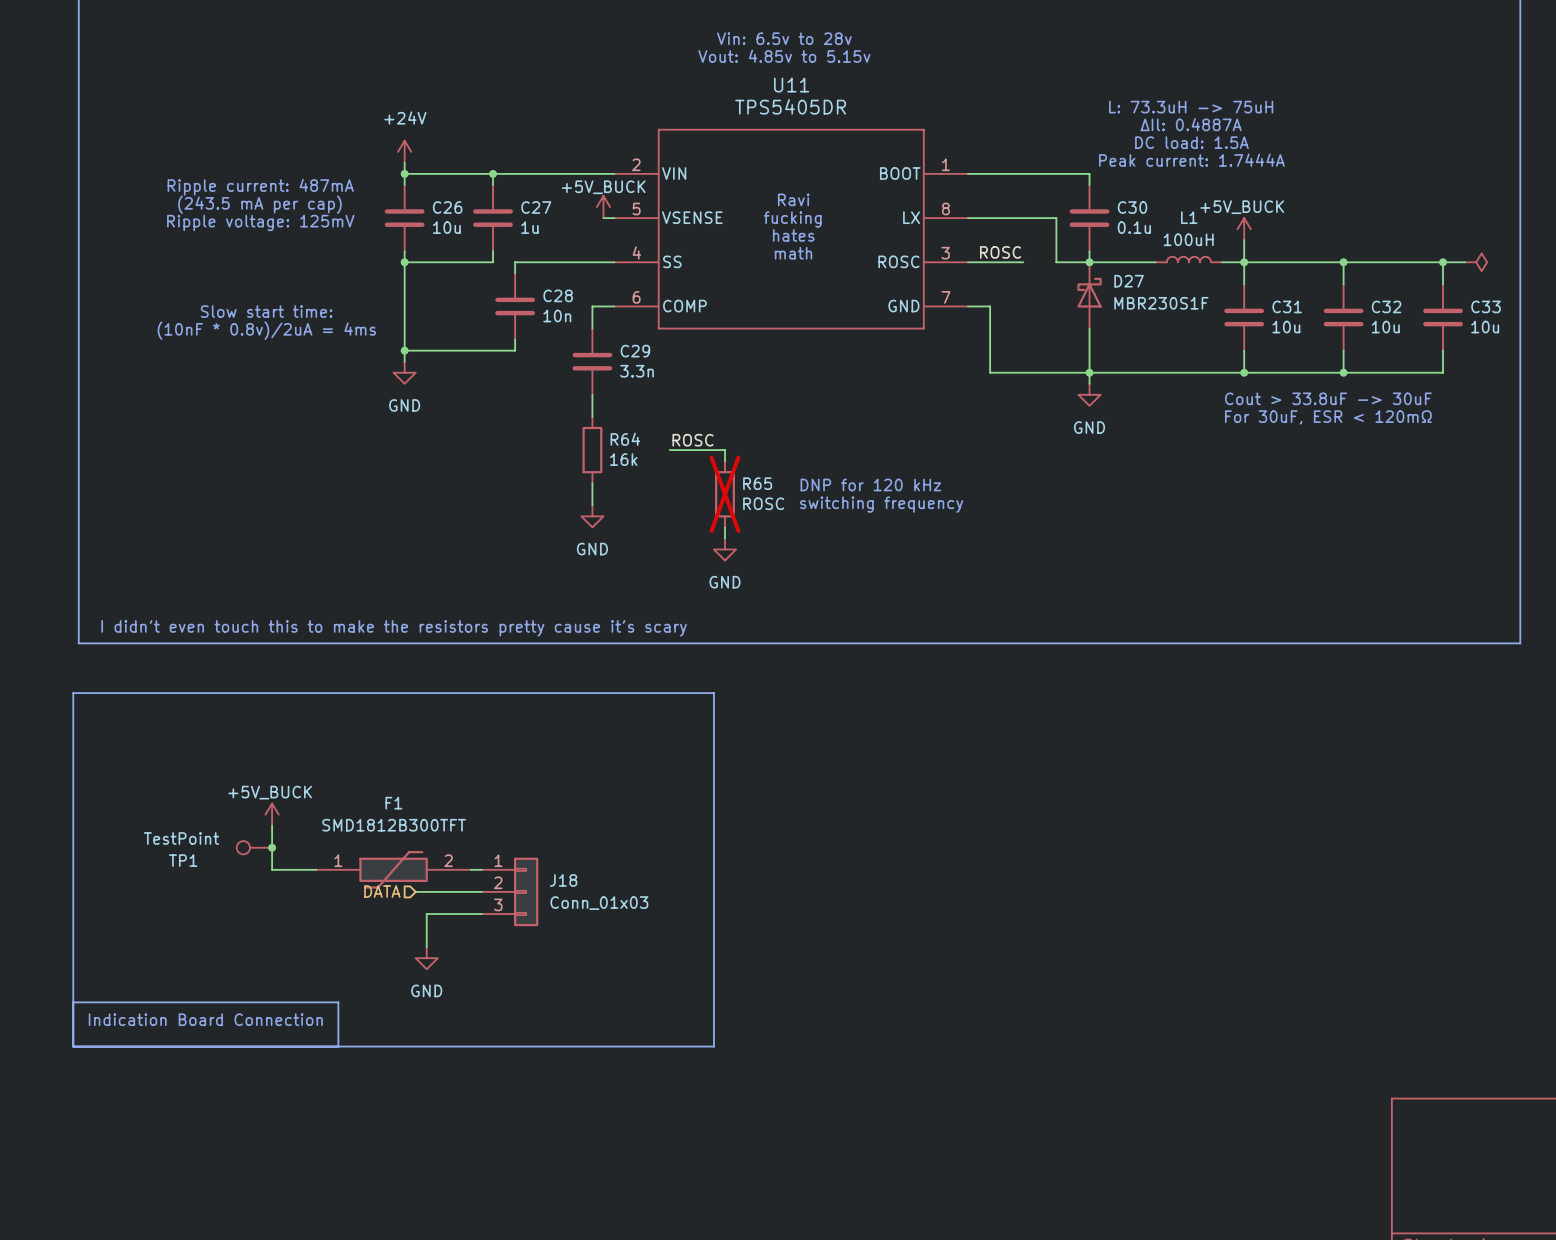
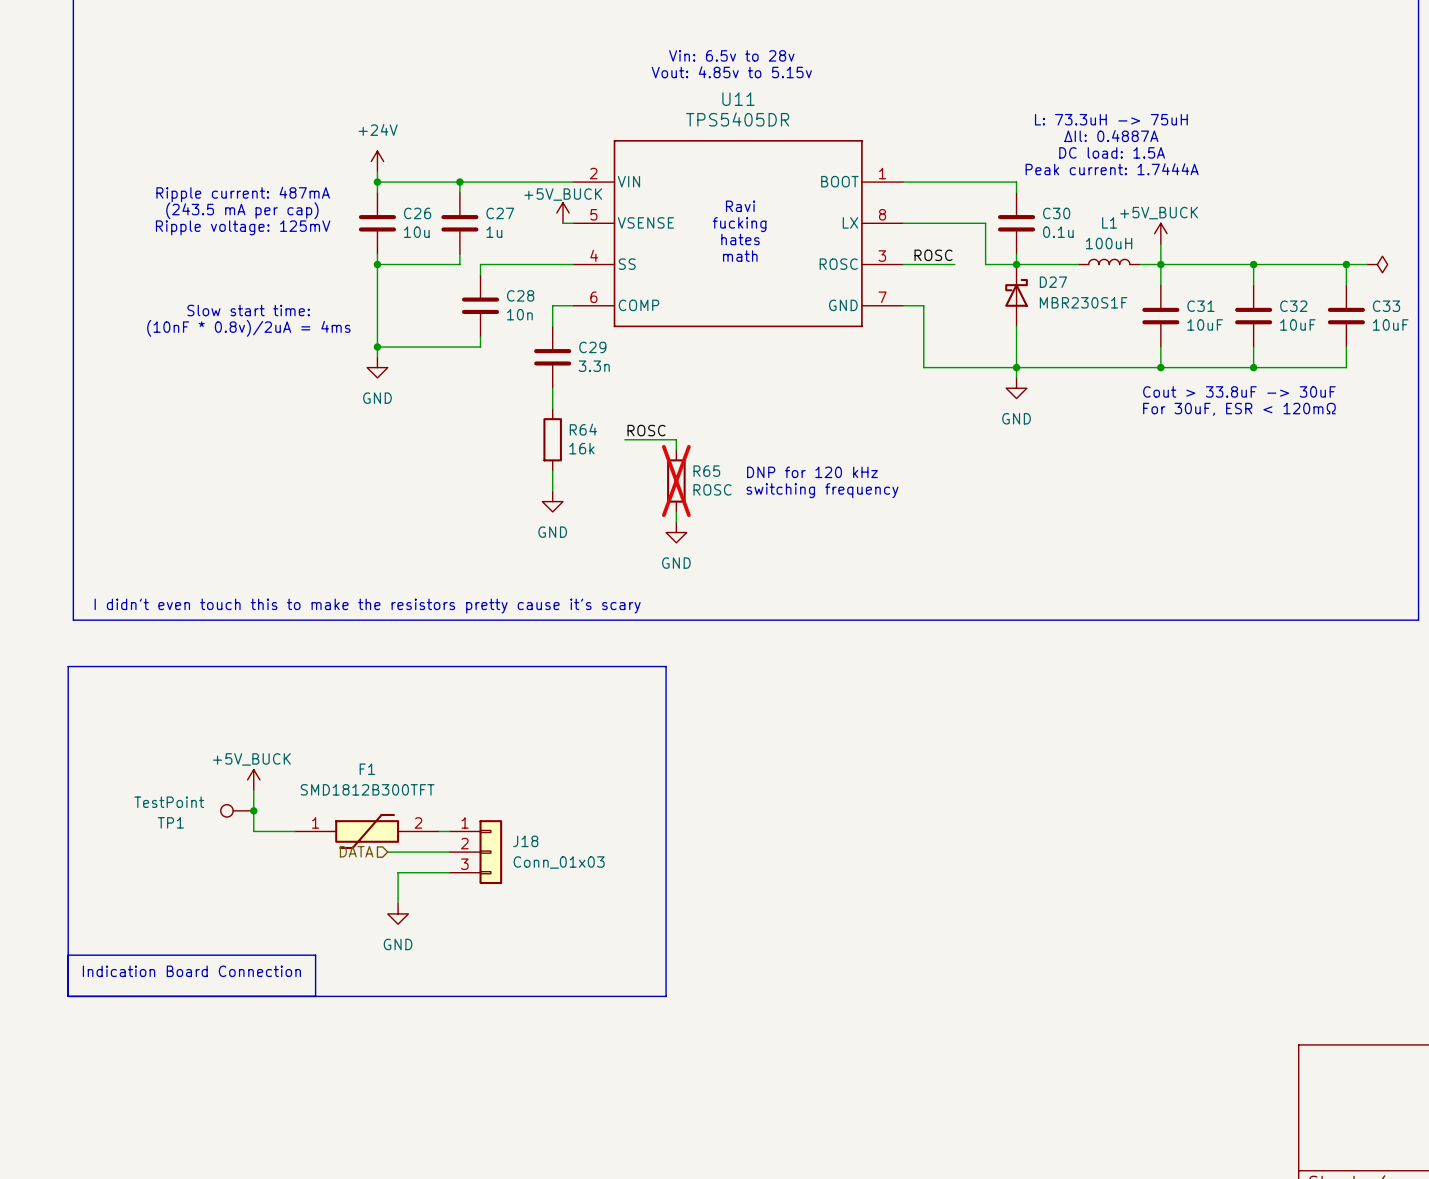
C31 value: 10u (1286, 327) -> 10uF (1205, 324)
C32 value: 10u (1385, 327) -> 10uF (1297, 324)
C33 value: 10u (1485, 327) -> 10uF (1390, 324)

